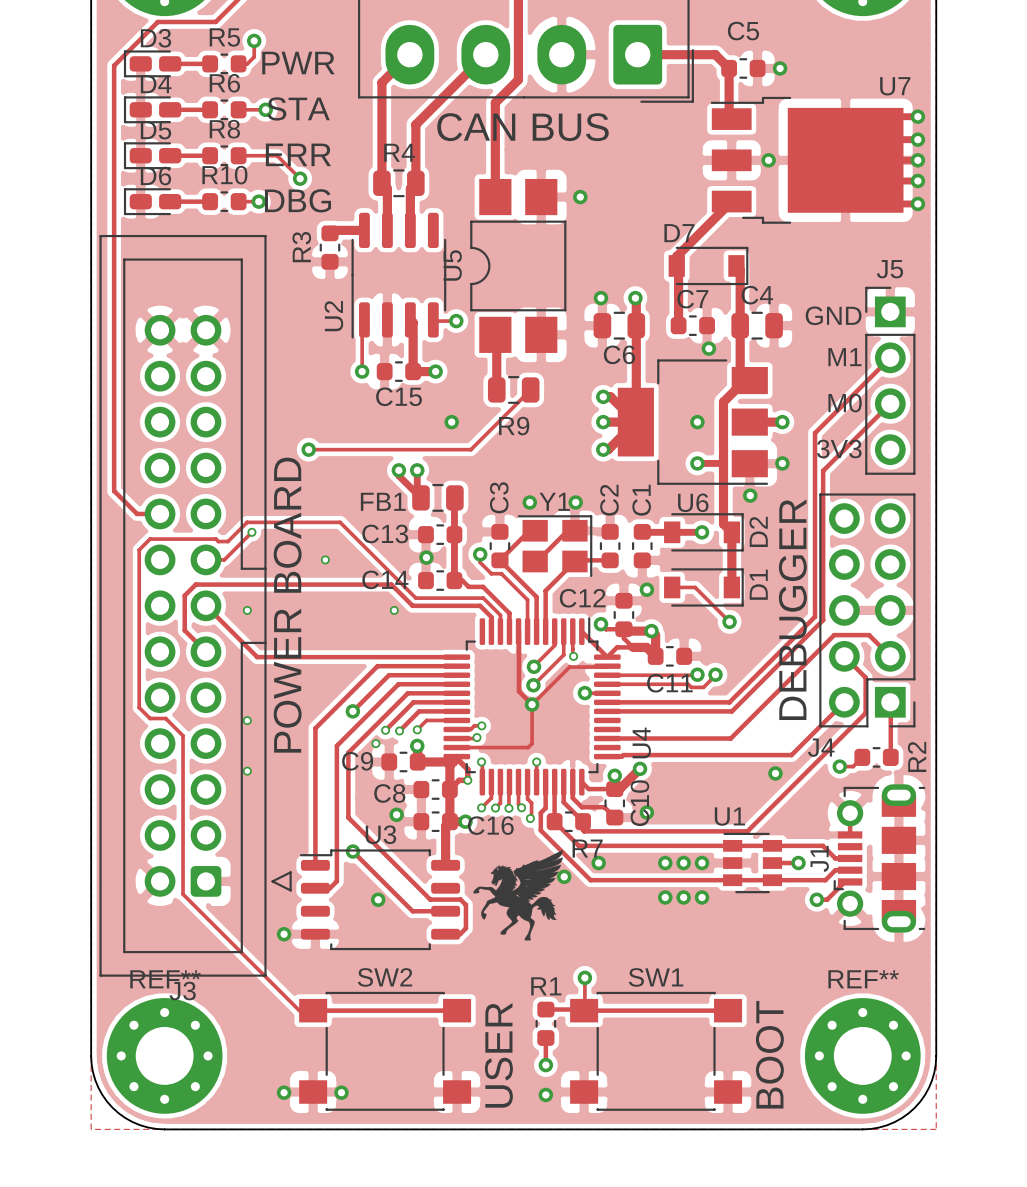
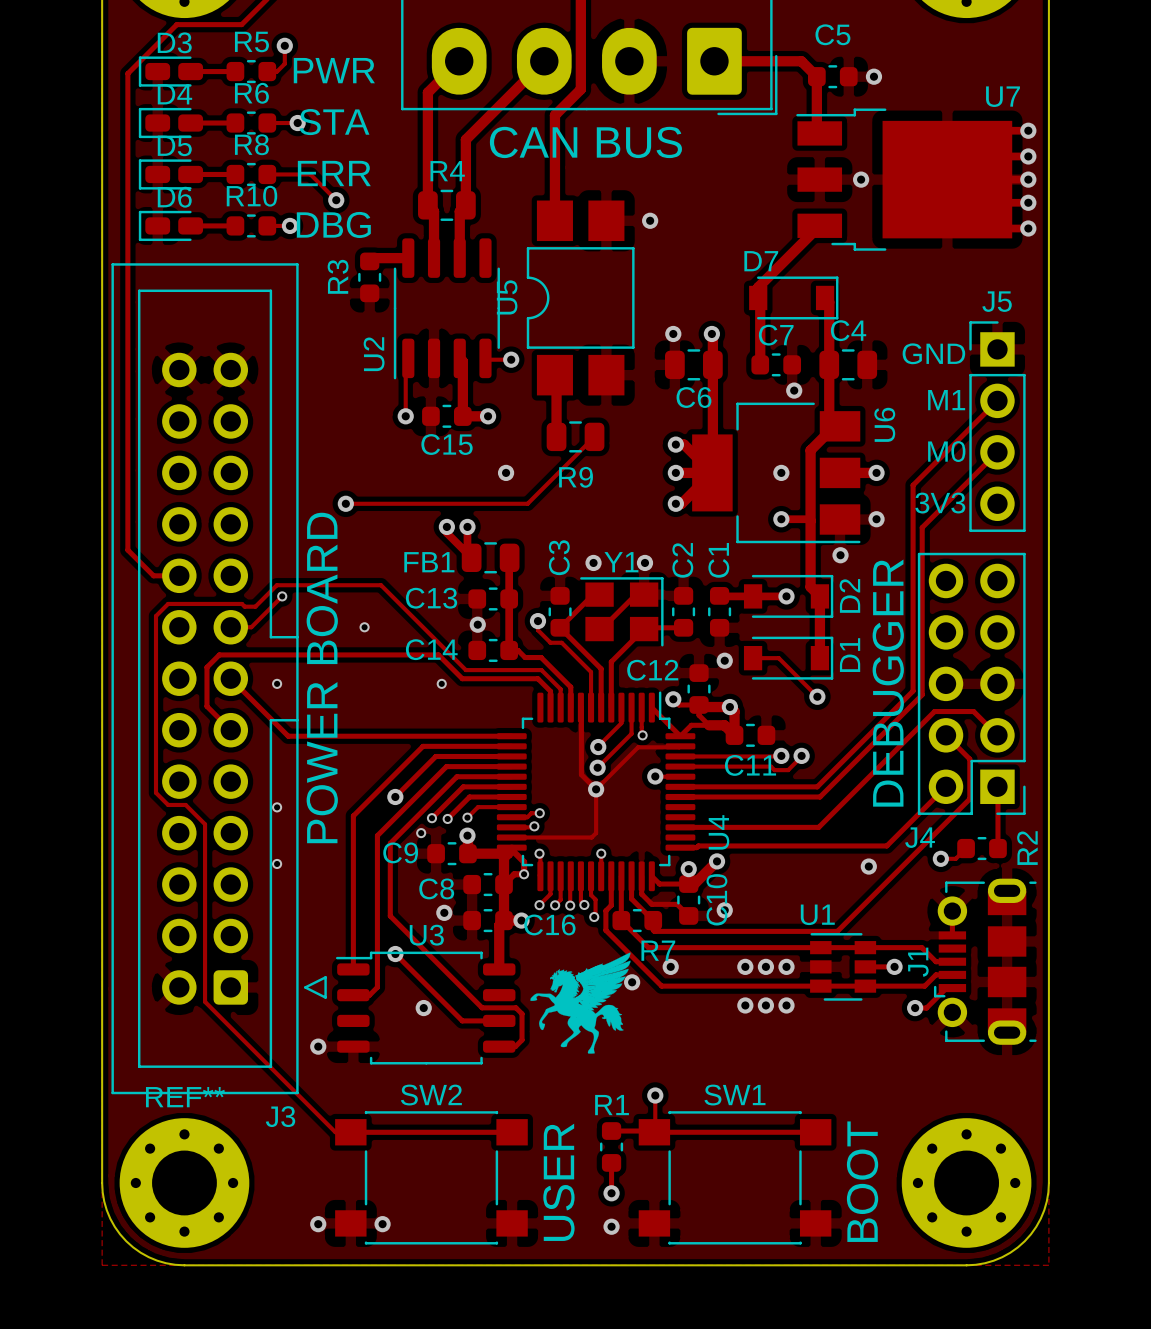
U6 name rotation: 0° (693, 502) -> 90° counterclockwise (884, 424)
U6 name position: U6 (693, 502) -> U6 (884, 424)
REF** name: REF** (863, 979) -> none
J3 name position: J3 (182, 991) -> J3 (280, 1116)

